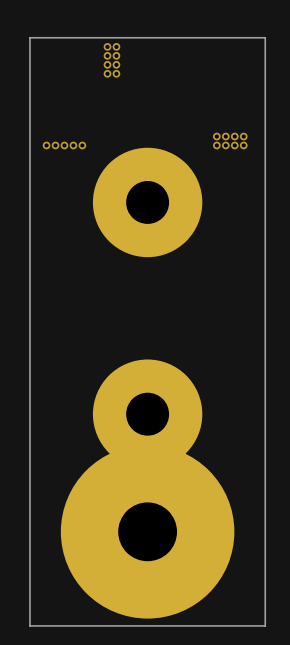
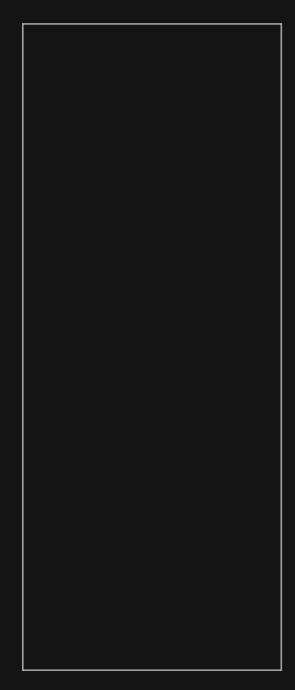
via: (107, 46) -> none
via: (116, 46) -> none
via: (107, 55) -> none
via: (116, 55) -> none
via: (107, 64) -> none
via: (116, 64) -> none
via: (107, 73) -> none
via: (116, 73) -> none
via: (216, 136) -> none
via: (225, 136) -> none
via: (234, 136) -> none
via: (243, 136) -> none
via: (46, 145) -> none
via: (55, 145) -> none
via: (64, 145) -> none
via: (73, 145) -> none
via: (82, 145) -> none
via: (216, 145) -> none
via: (225, 145) -> none
via: (234, 145) -> none
via: (243, 145) -> none
part: (147, 202) -> none
part: (147, 414) -> none
part: (147, 531) -> none

